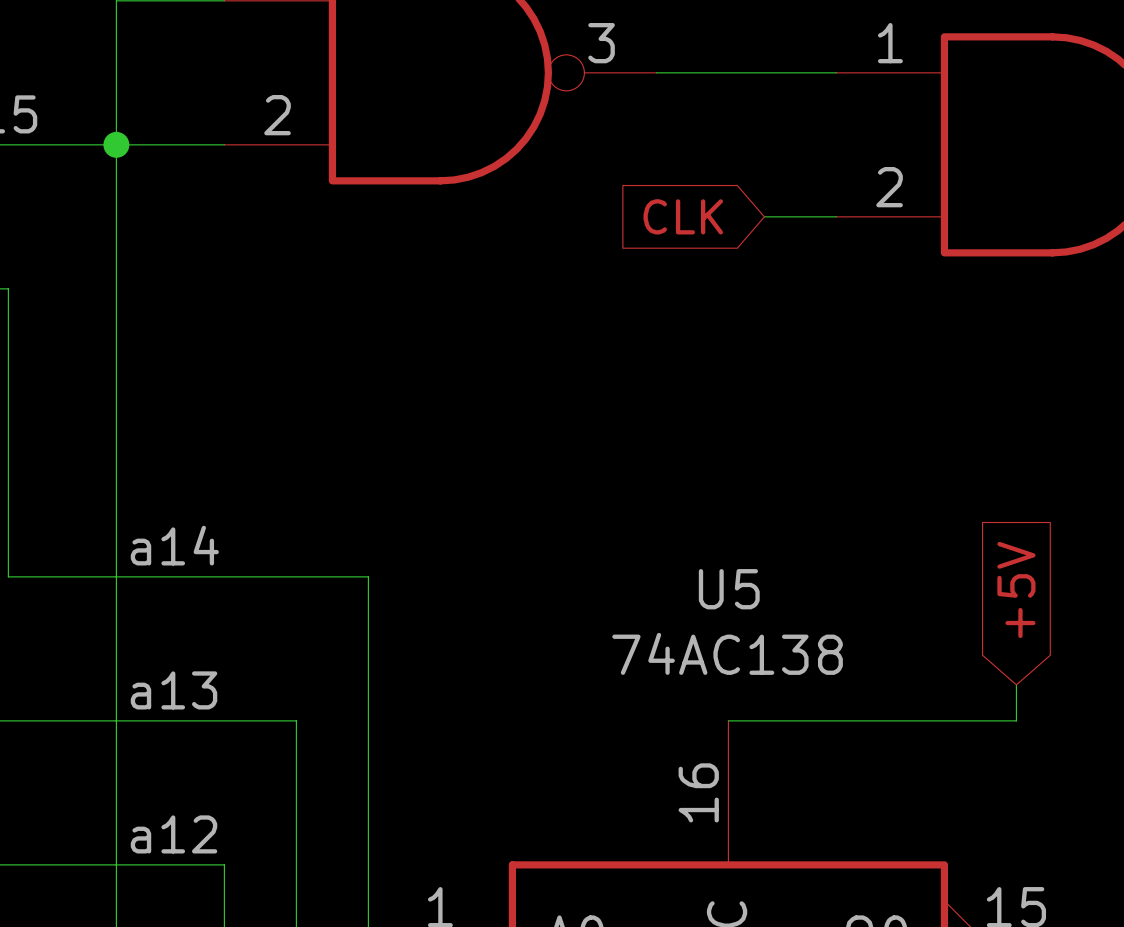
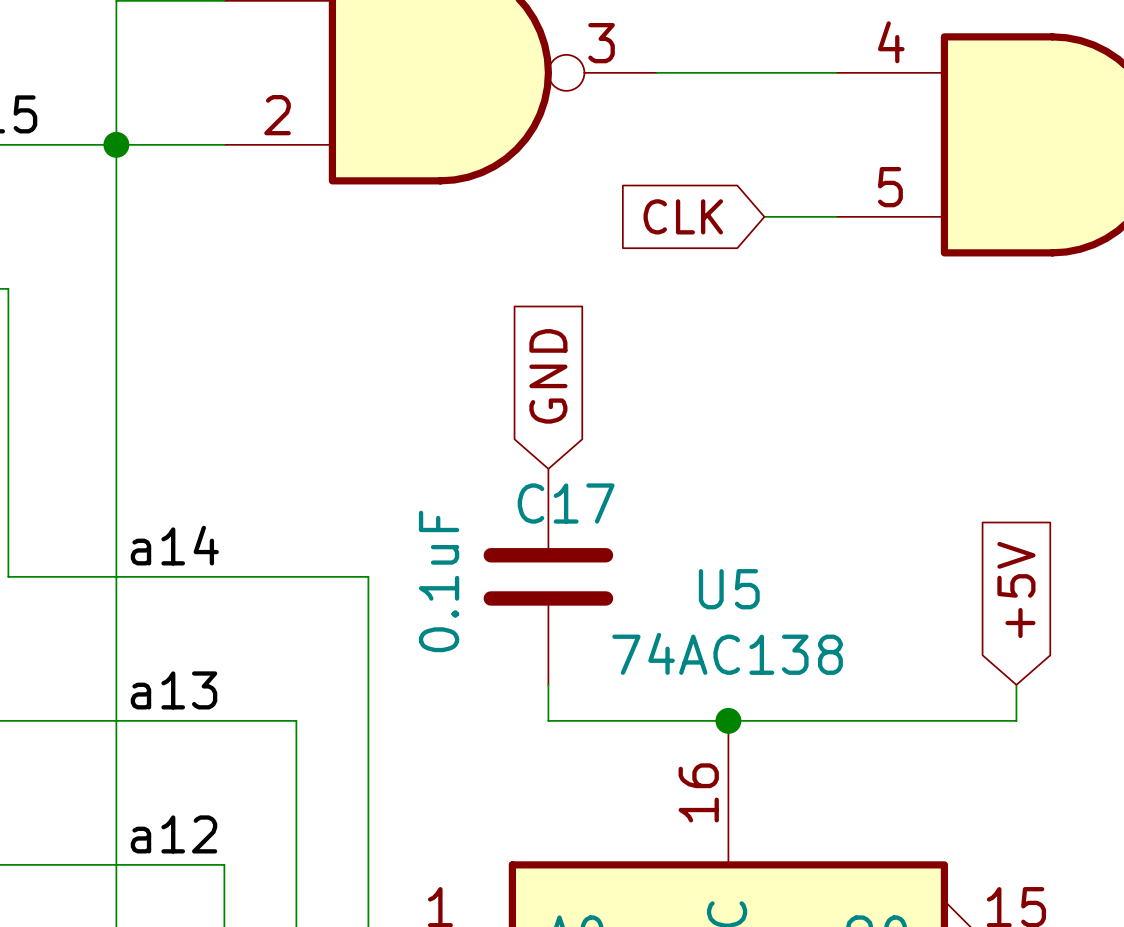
part pin number: 1 (890, 43) -> 4 (891, 42)
part pin number: 2 (889, 187) -> 5 (890, 187)
global label: none -> GND (548, 376)
C17: none -> 0.1uF (548, 576)
wire: none -> (548, 684) (548, 720) (728, 720)
junction: none -> (728, 720)

